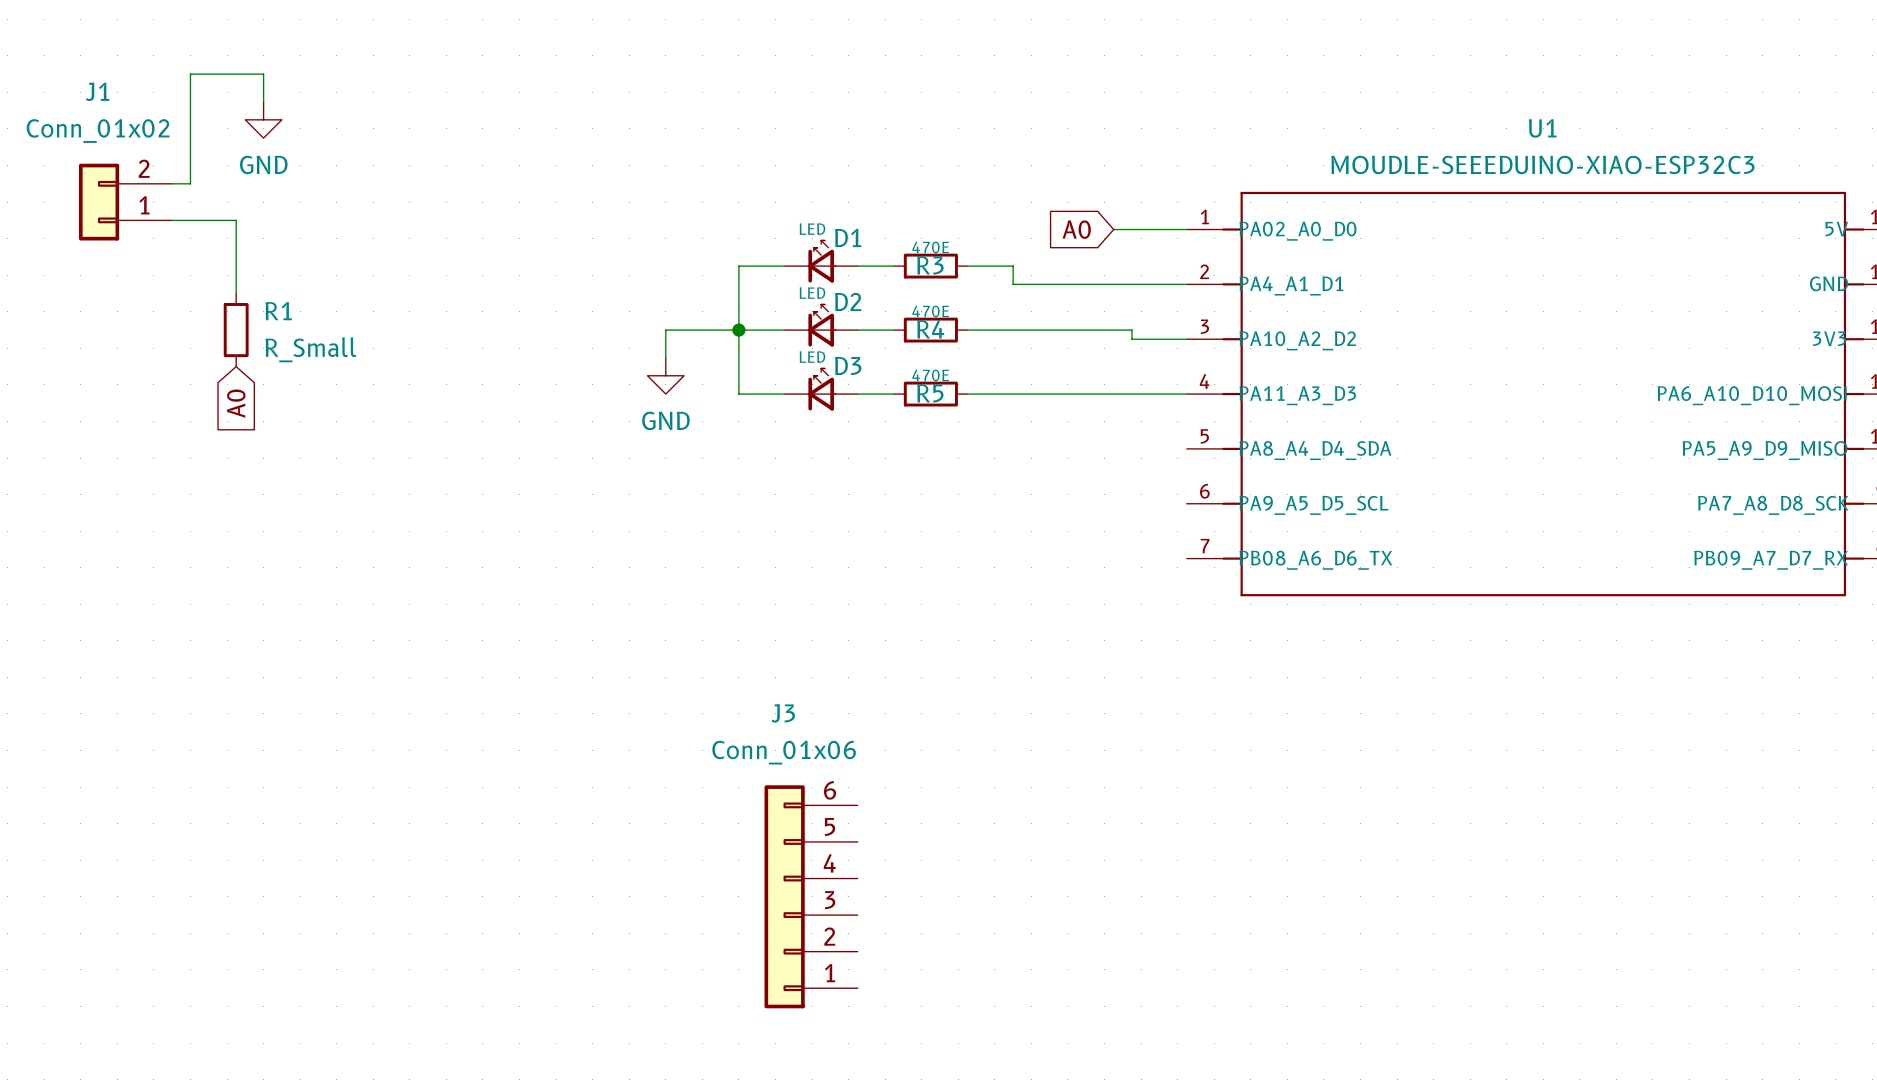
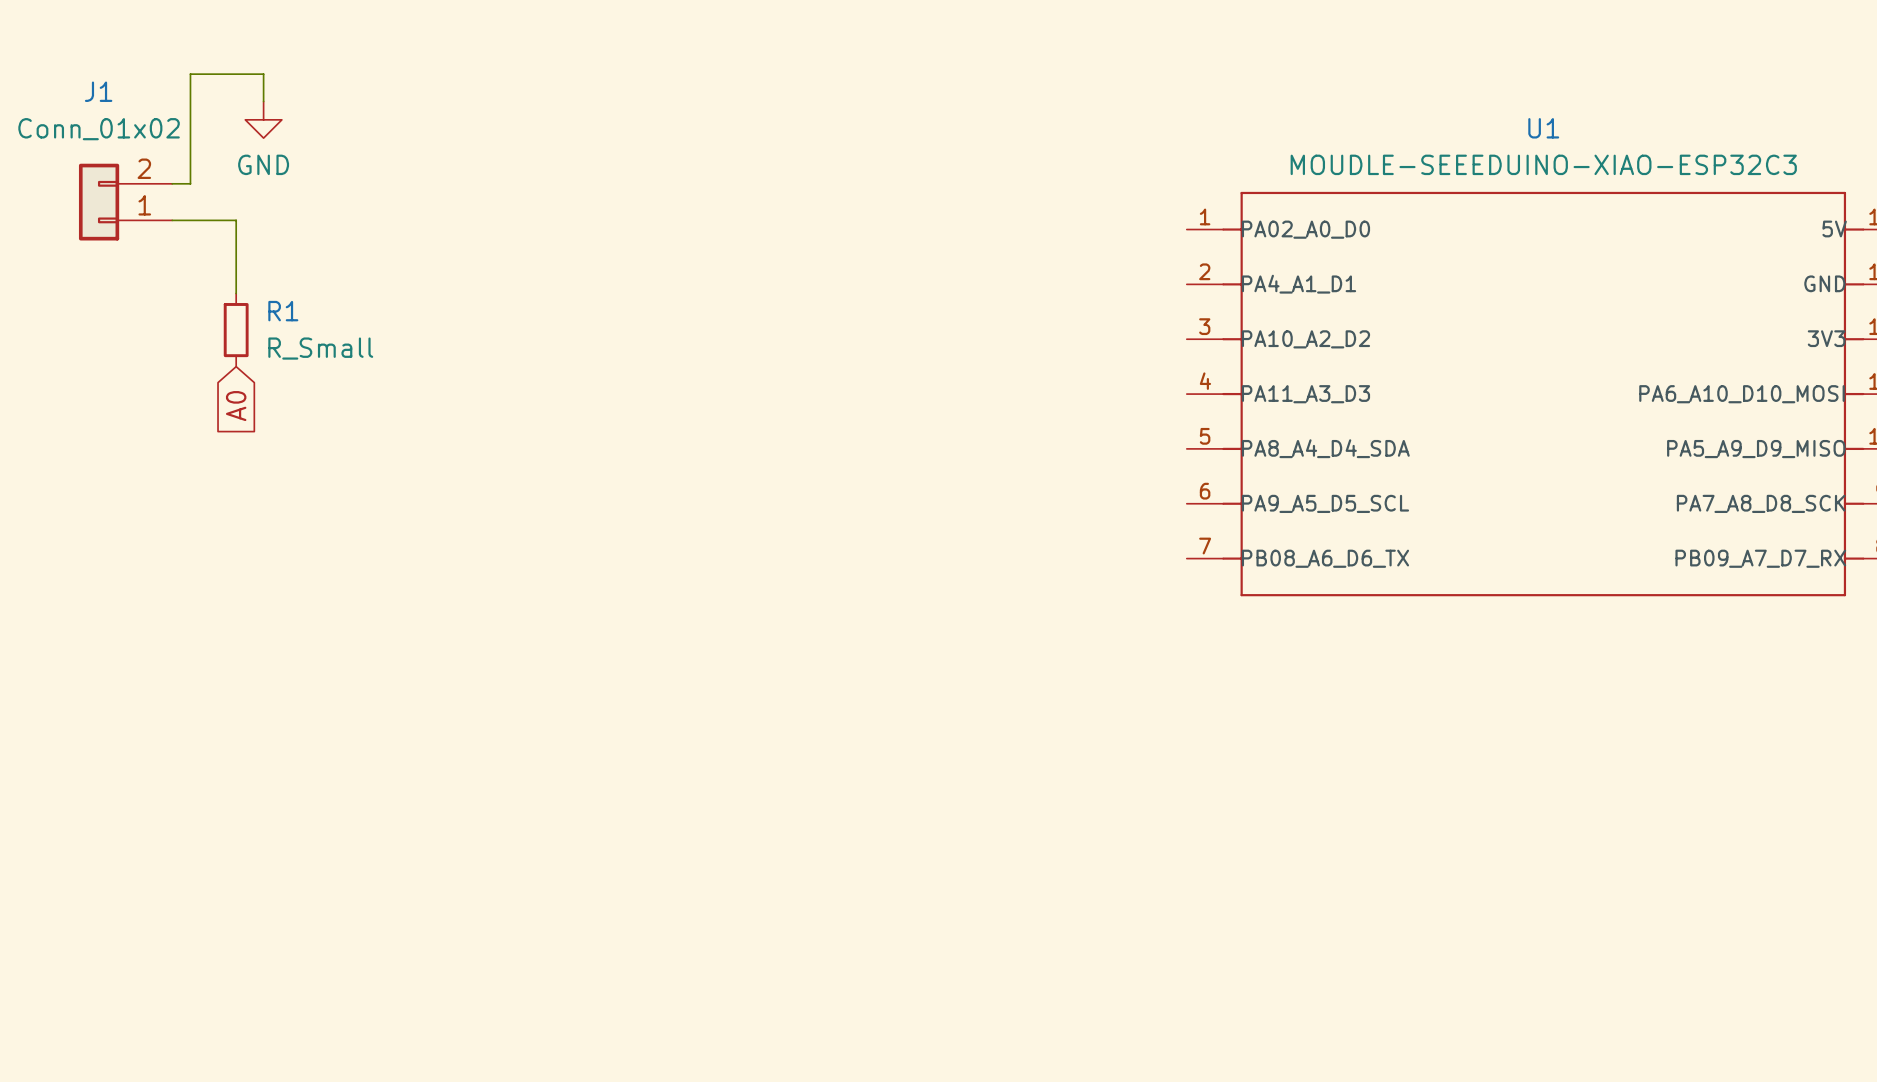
global label: A0 (1076, 229) -> none
wire: (1113, 229) (1186, 229) -> none
D1: LED (821, 261) -> none
wire: (784, 266) (738, 266) (738, 394) (784, 394) -> none
wire: (857, 266) (894, 266) -> none
R3: 470E (930, 266) -> none
wire: (967, 266) (1013, 266) (1013, 284) (1186, 284) -> none
D2: LED (821, 325) -> none
junction: (738, 330) -> none
wire: (784, 330) (665, 330) (665, 357) -> none
wire: (857, 330) (894, 330) -> none
R4: 470E (930, 330) -> none
wire: (967, 330) (1131, 330) (1131, 339) (1186, 339) -> none
power symbol: GND (665, 375) -> none
D3: LED (821, 389) -> none
wire: (857, 394) (894, 394) -> none
R5: 470E (930, 394) -> none
wire: (967, 394) (1186, 394) -> none
J3: Conn_01x06 (811, 896) -> none

